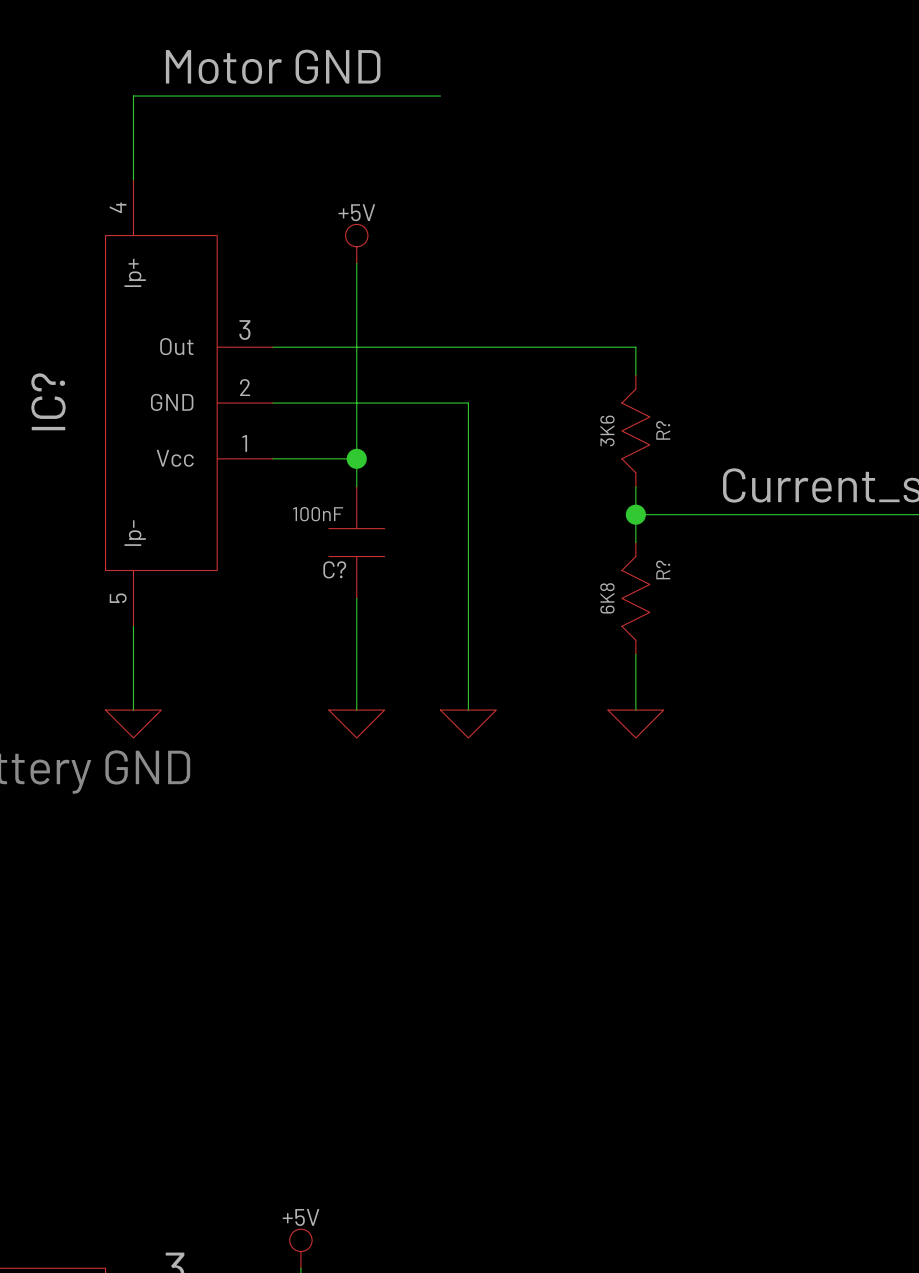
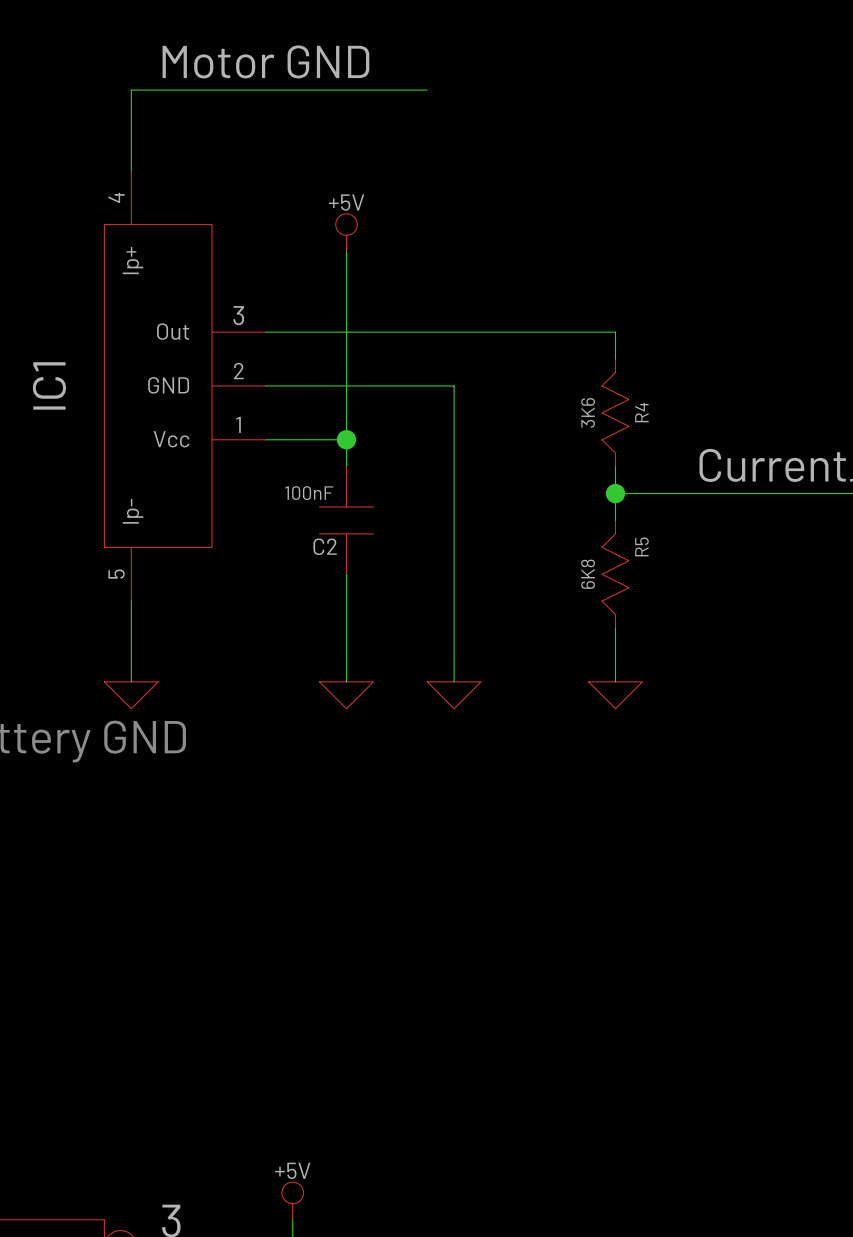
IC? name: IC? (48, 401) -> IC1 (49, 385)
R? name: R? (663, 430) -> R4 (641, 412)
C? name: C? (334, 569) -> C2 (325, 546)
R? name: R? (663, 569) -> R5 (641, 546)

